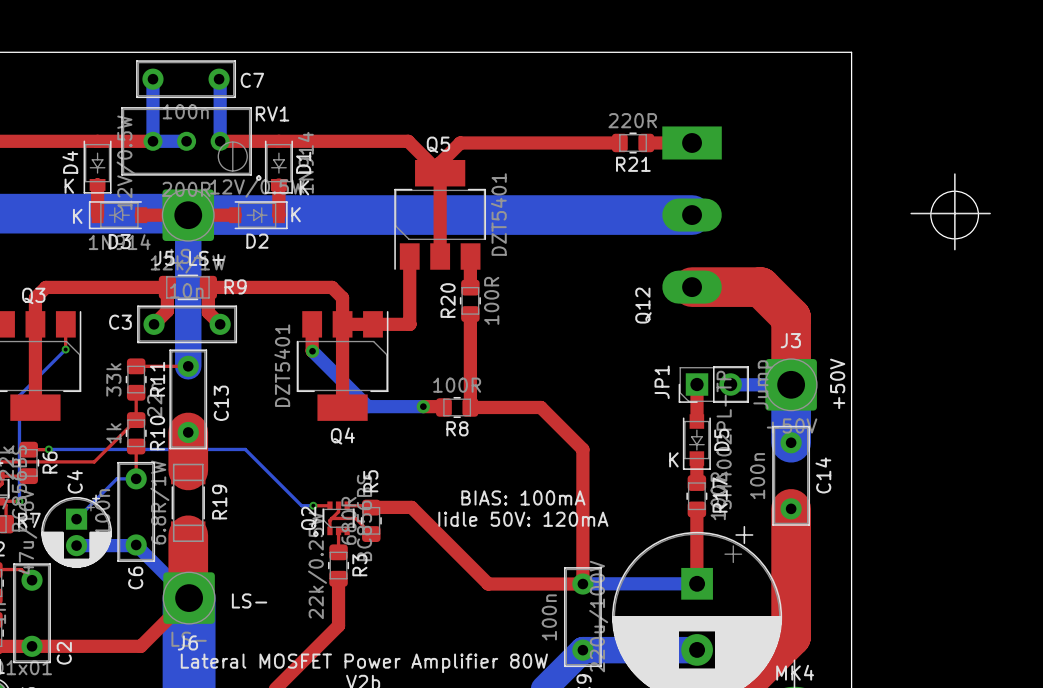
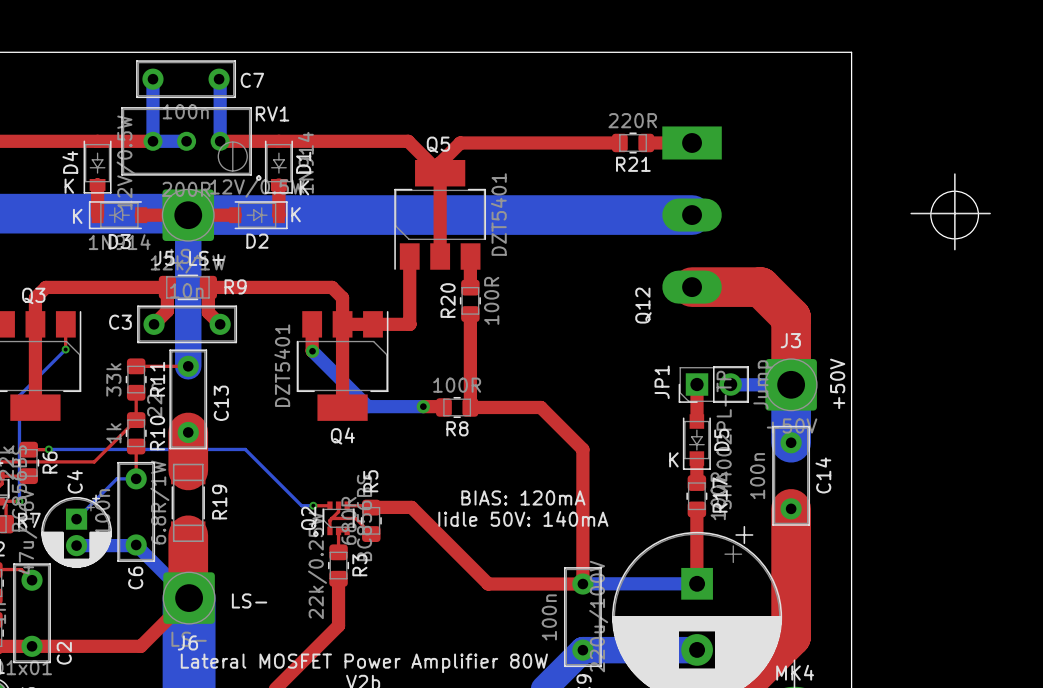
text: BIAS: 100mA (523, 497) -> BIAS: 120mA (523, 497)
text: Iidle 50V: 120mA (523, 519) -> Iidle 50V: 140mA (523, 518)

